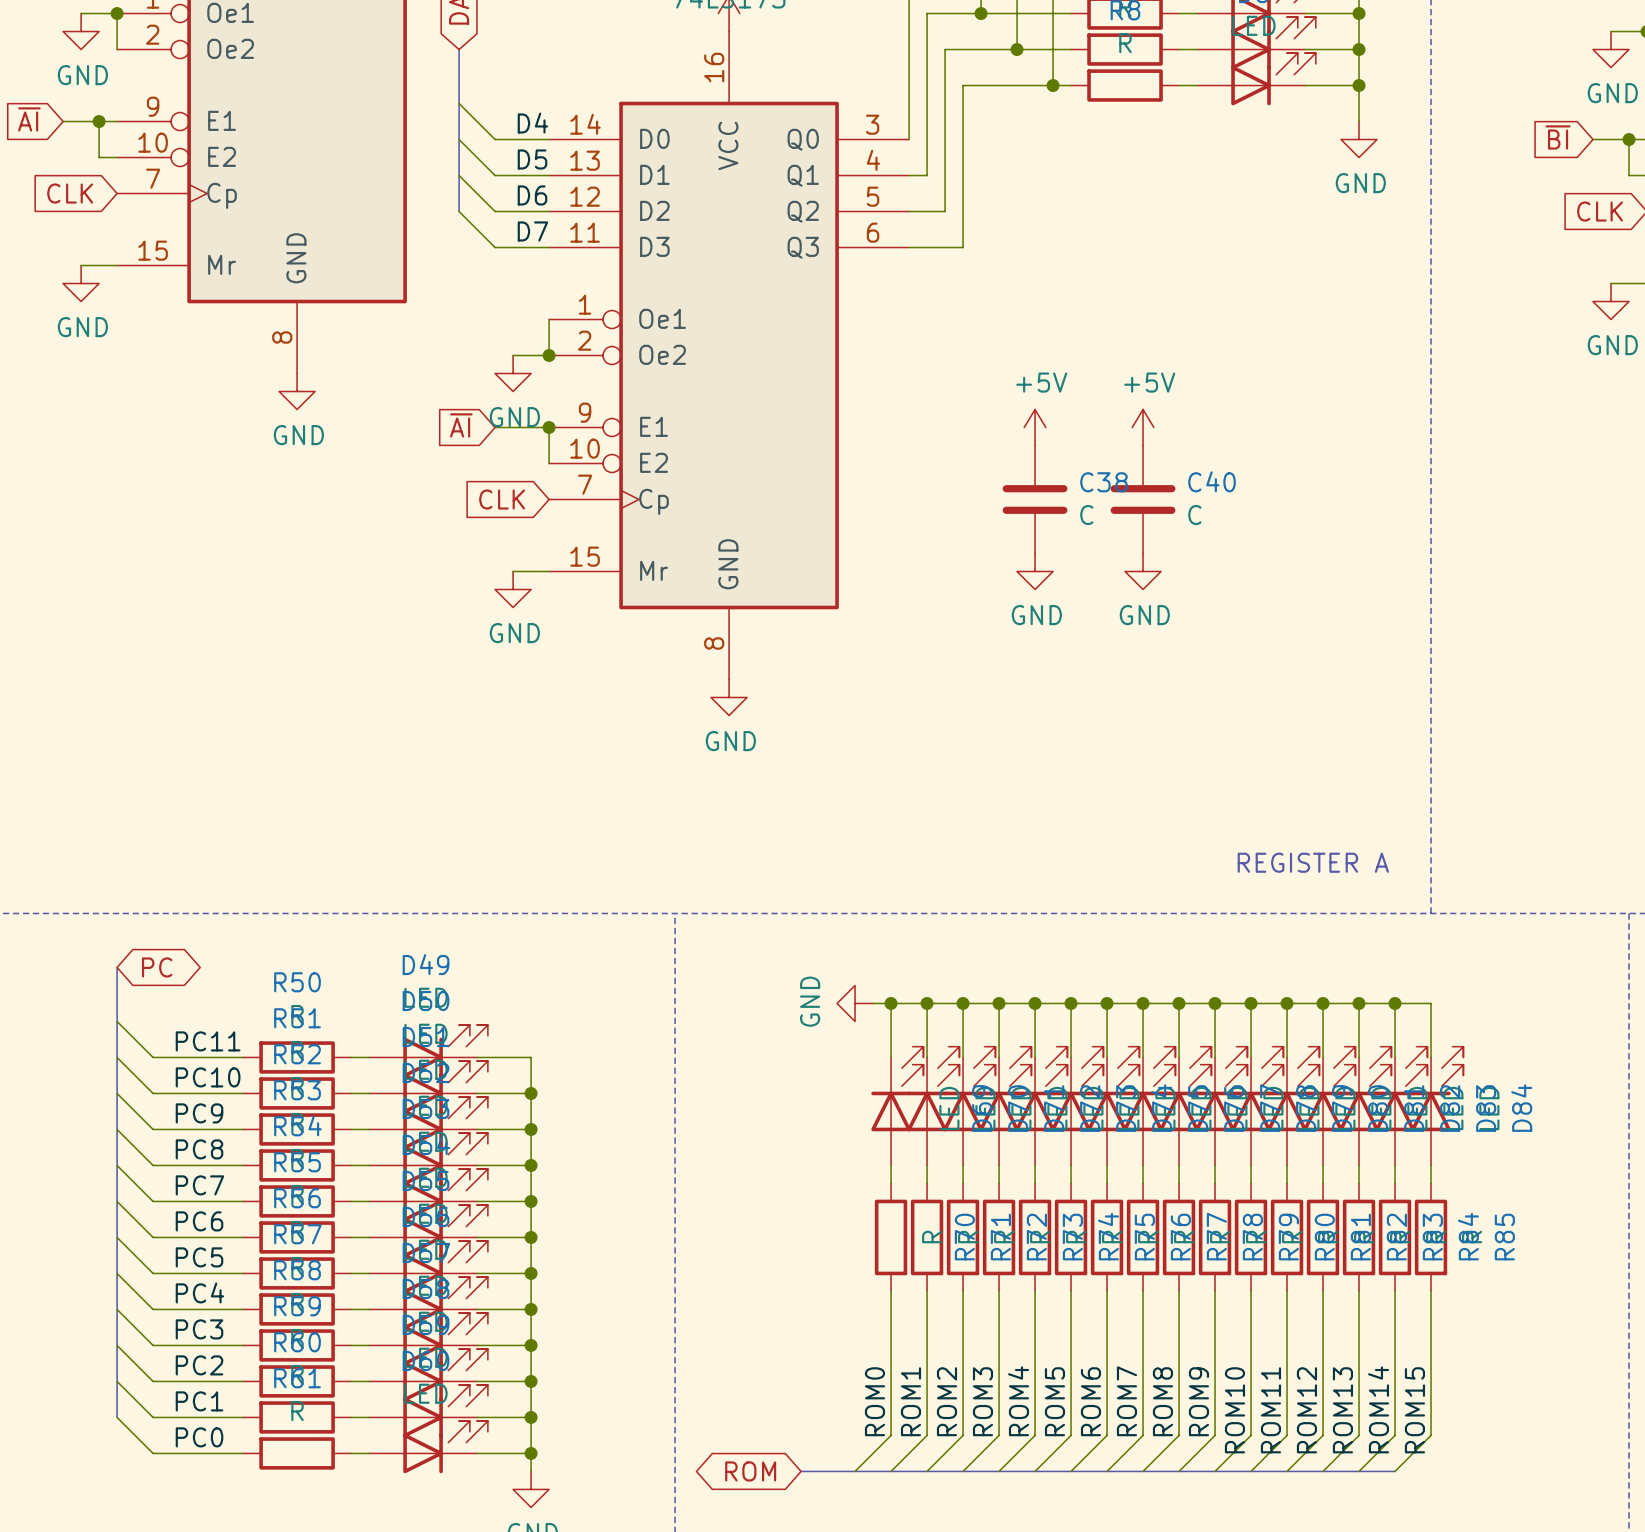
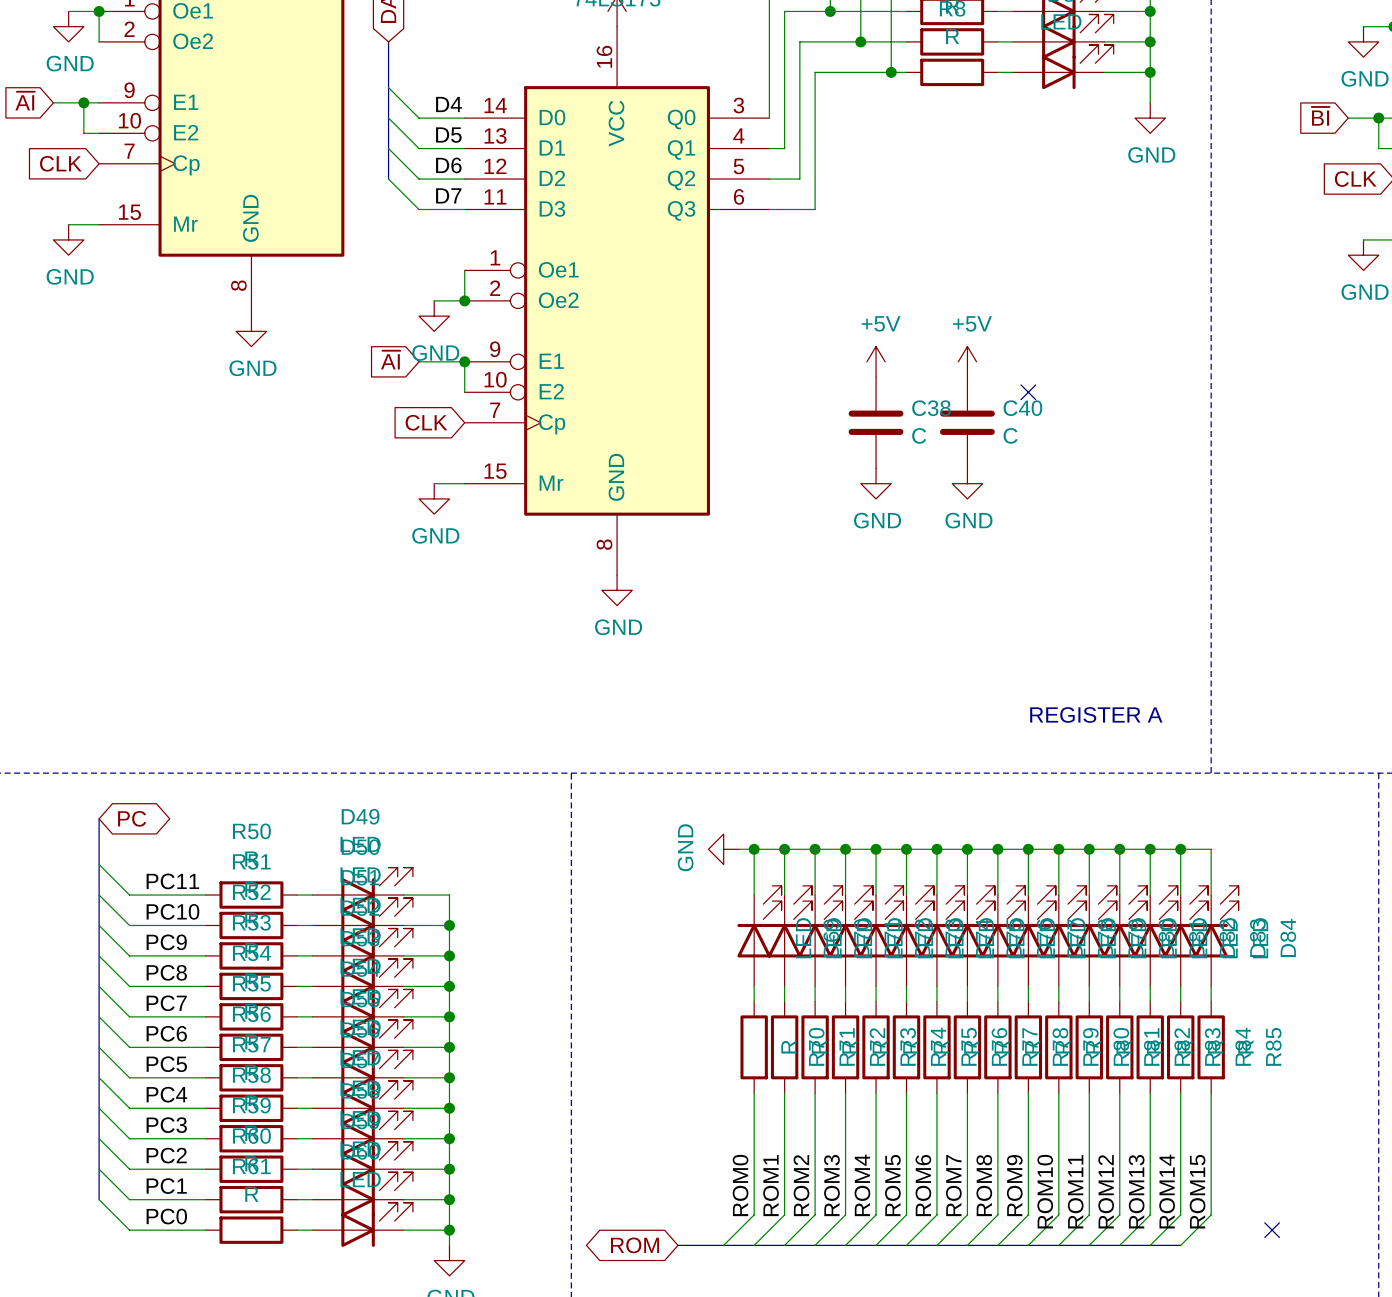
no-connect mark: none -> (1028, 392)
text position: REGISTER A (1313, 862) -> REGISTER A (1096, 714)
no-connect mark: none -> (1272, 1230)

